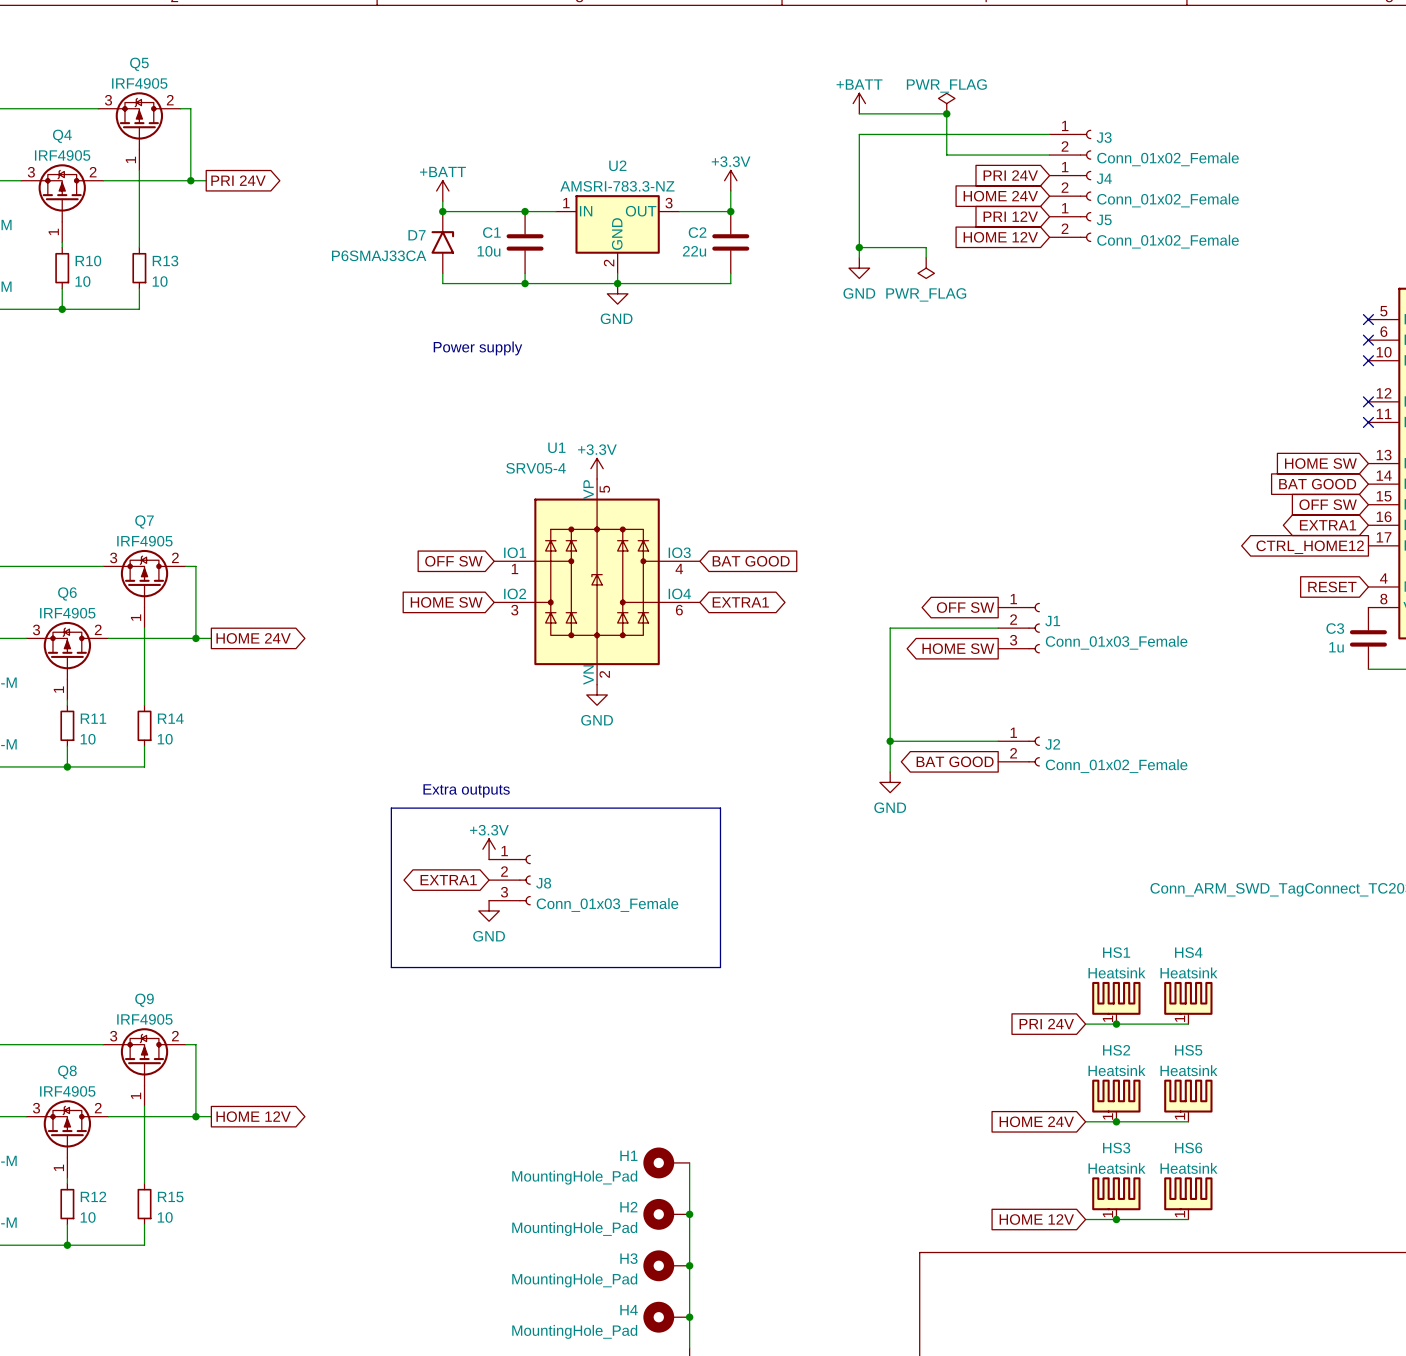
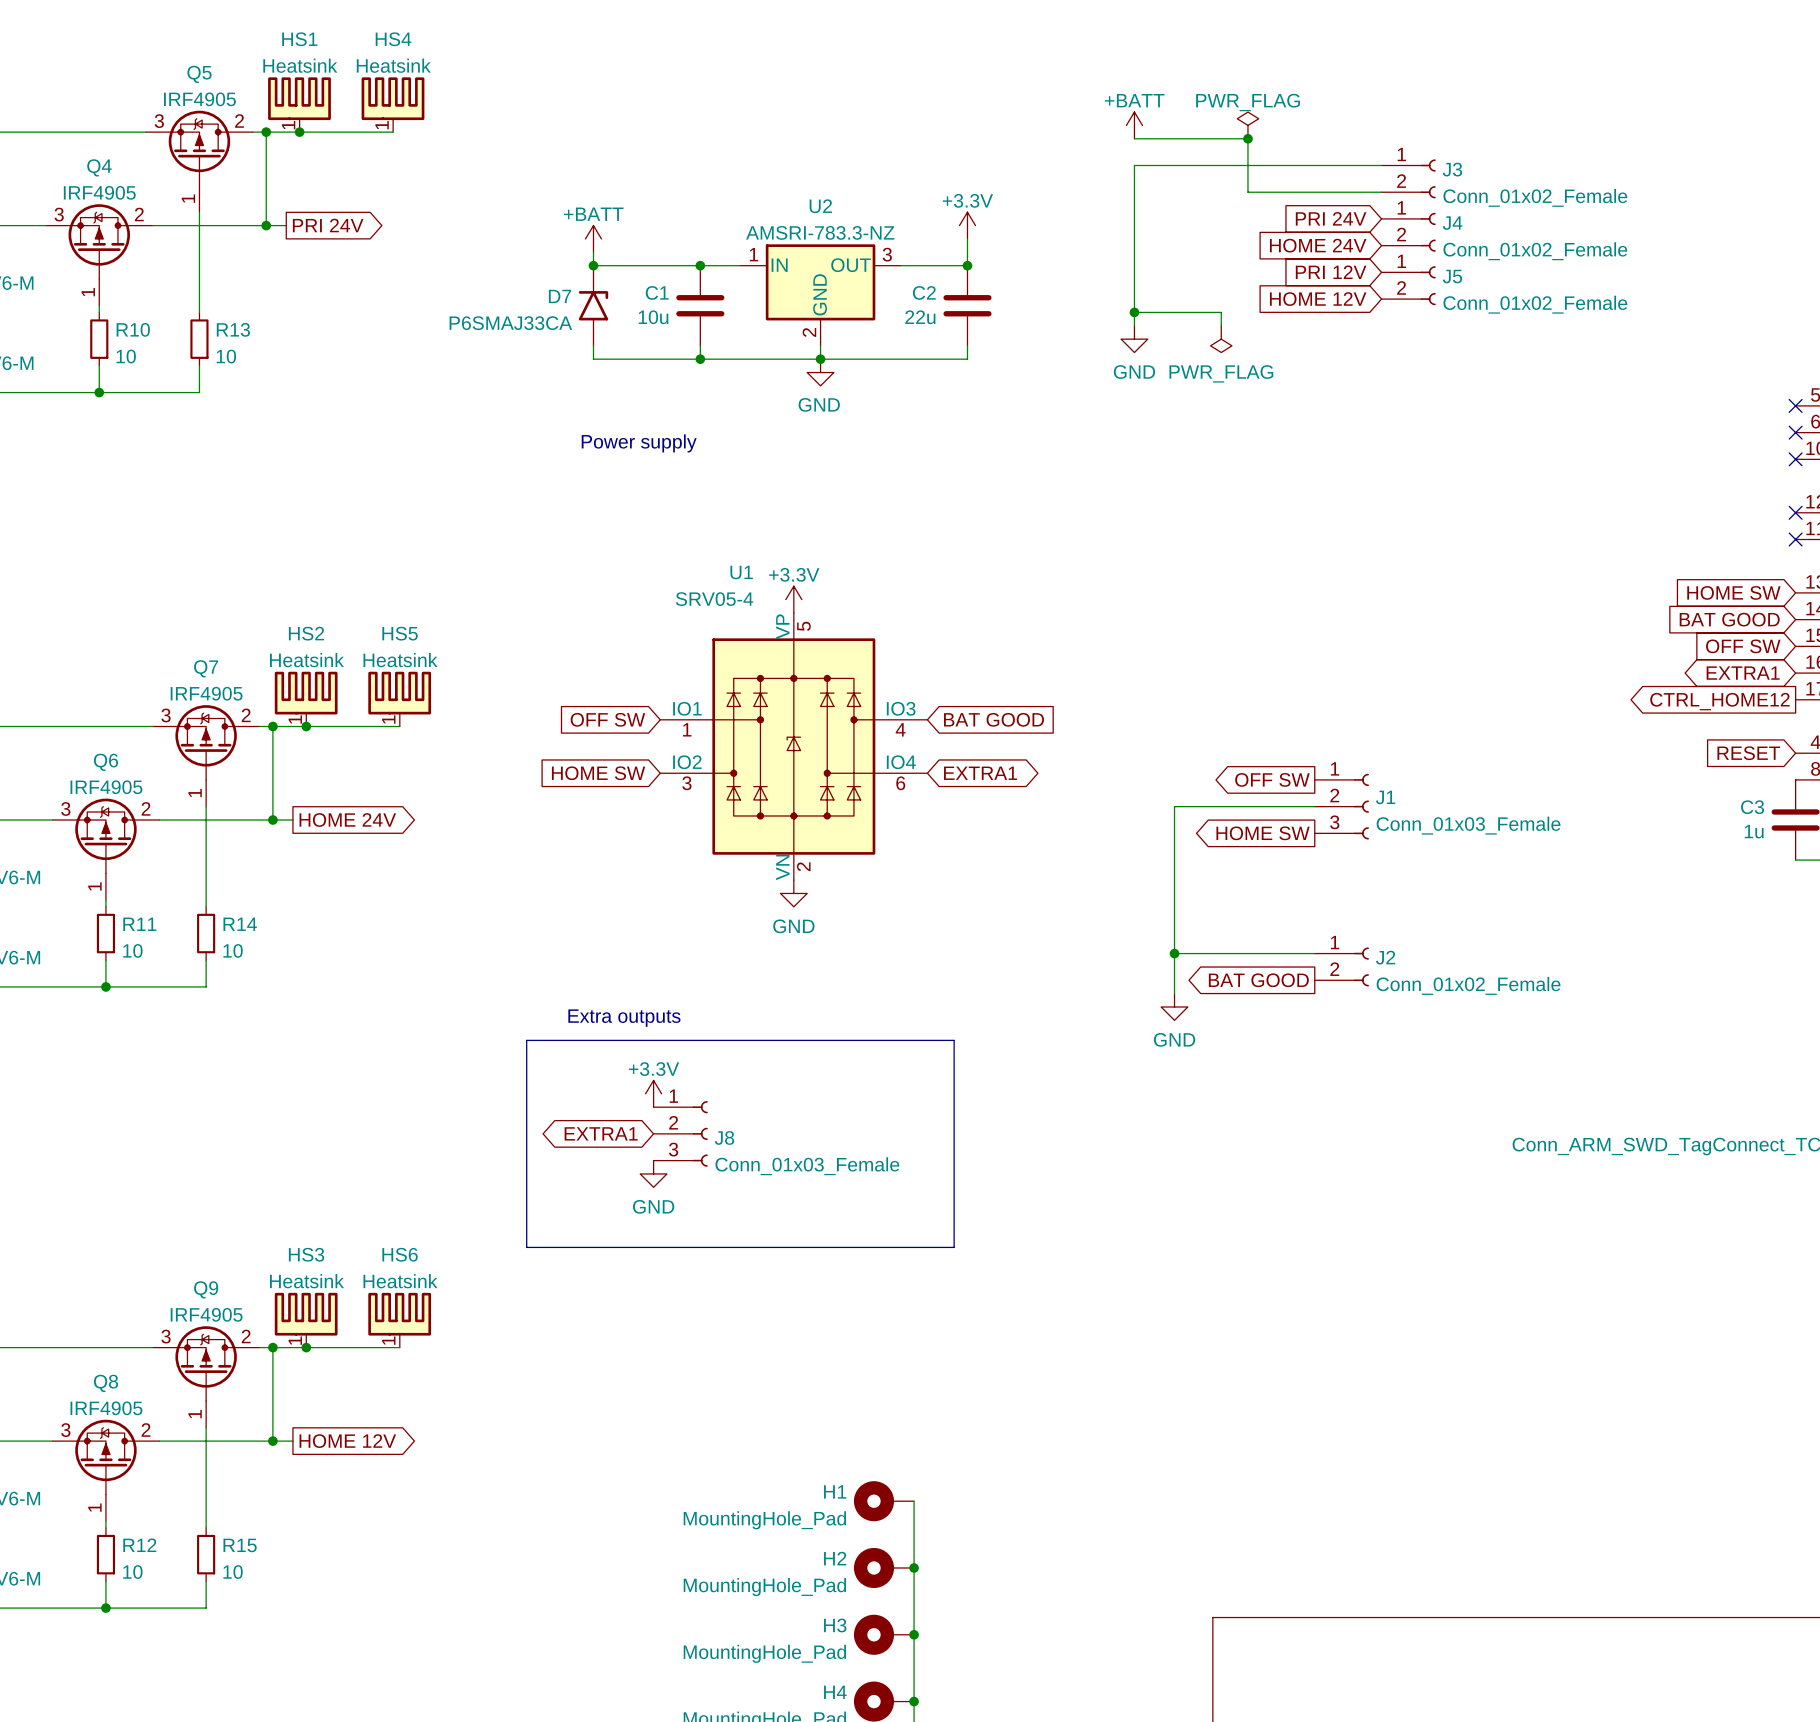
wire: none -> (266, 132) (393, 132)
junction: none -> (266, 132)
junction: none -> (299, 132)
wire: none -> (272, 726) (399, 726)
junction: none -> (272, 726)
junction: none -> (306, 726)
HS1 position: (1116, 1003) -> (299, 104)
HS4 position: (1188, 1003) -> (392, 104)
global label: PRI 24V (1046, 1024) -> none
wire: (1085, 1024) (1188, 1024) -> none
junction: (1116, 1024) -> none
wire: none -> (272, 1347) (399, 1347)
junction: none -> (272, 1347)
junction: none -> (306, 1347)
HS2 position: (1116, 1100) -> (306, 699)
HS5 position: (1188, 1100) -> (399, 699)
global label: HOME 24V (1036, 1121) -> none
wire: (1085, 1121) (1188, 1121) -> none
junction: (1116, 1121) -> none
HS3 position: (1116, 1198) -> (306, 1320)
HS6 position: (1188, 1198) -> (399, 1320)
global label: HOME 12V (1036, 1219) -> none
wire: (1085, 1219) (1188, 1219) -> none
junction: (1116, 1219) -> none

